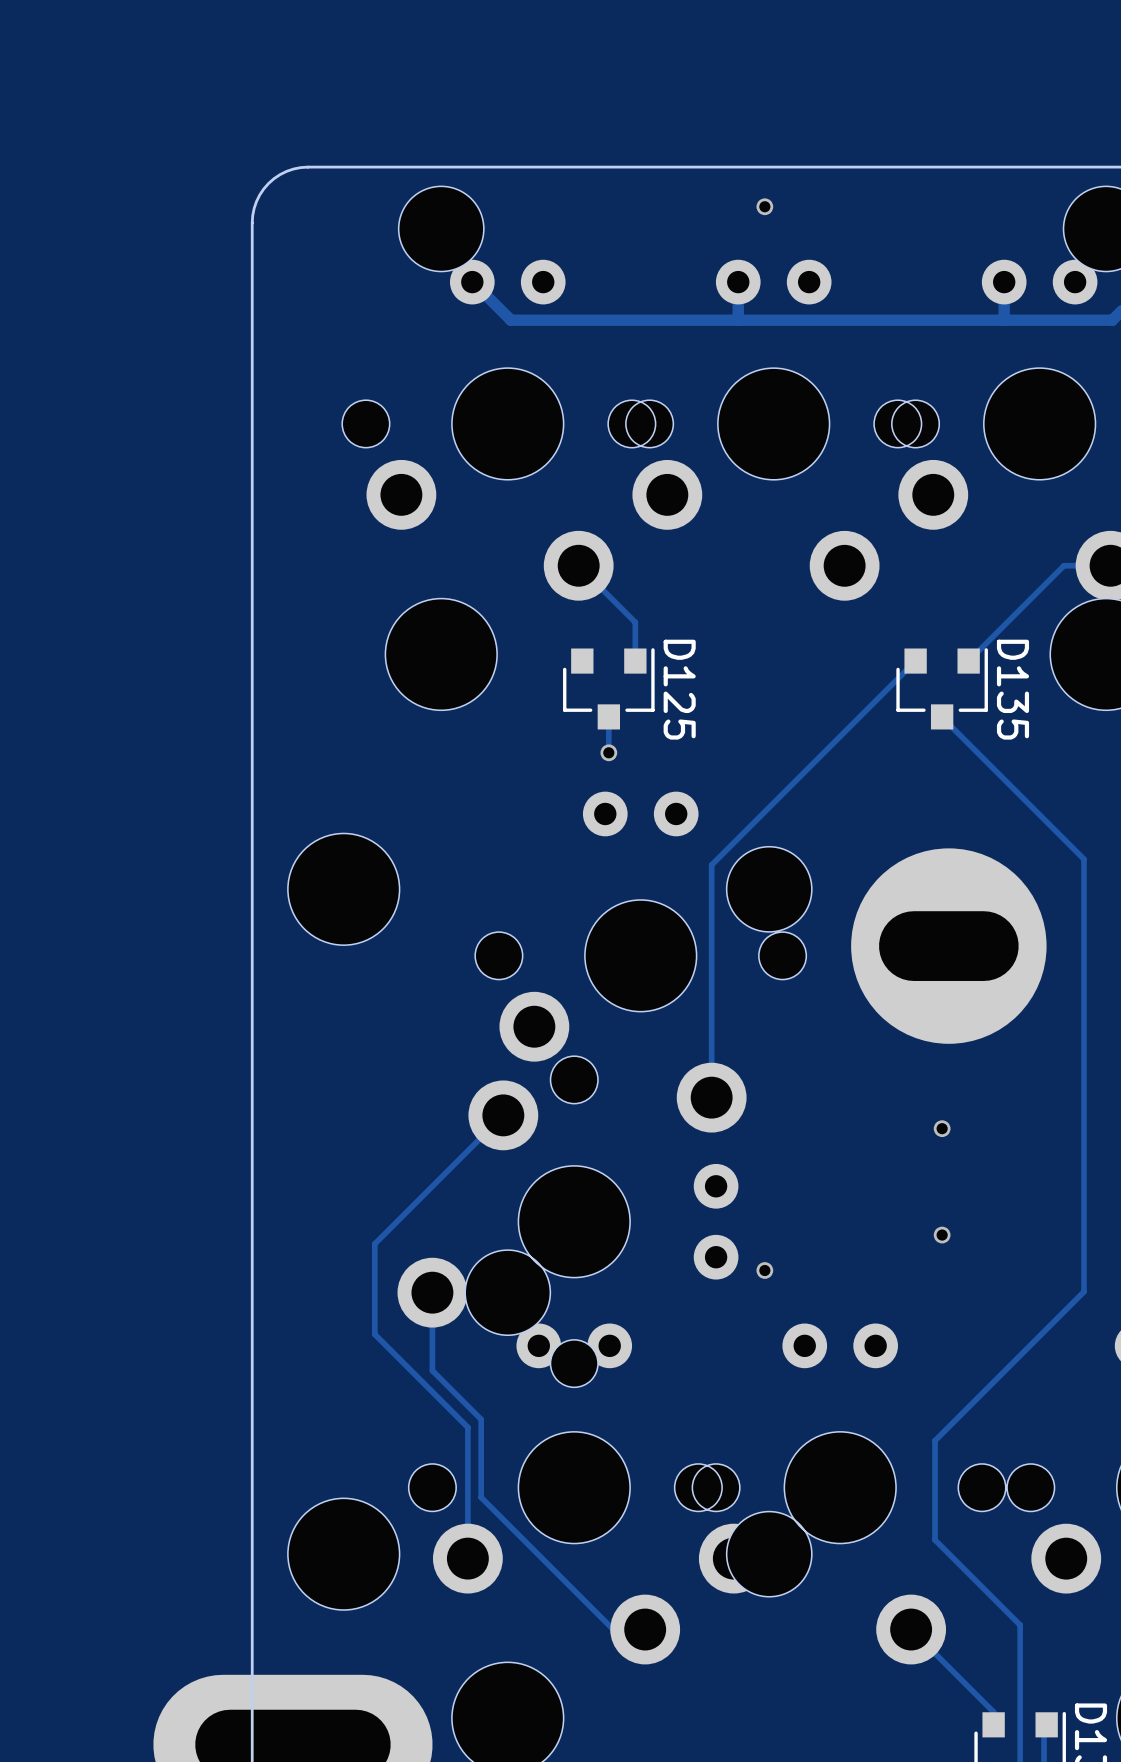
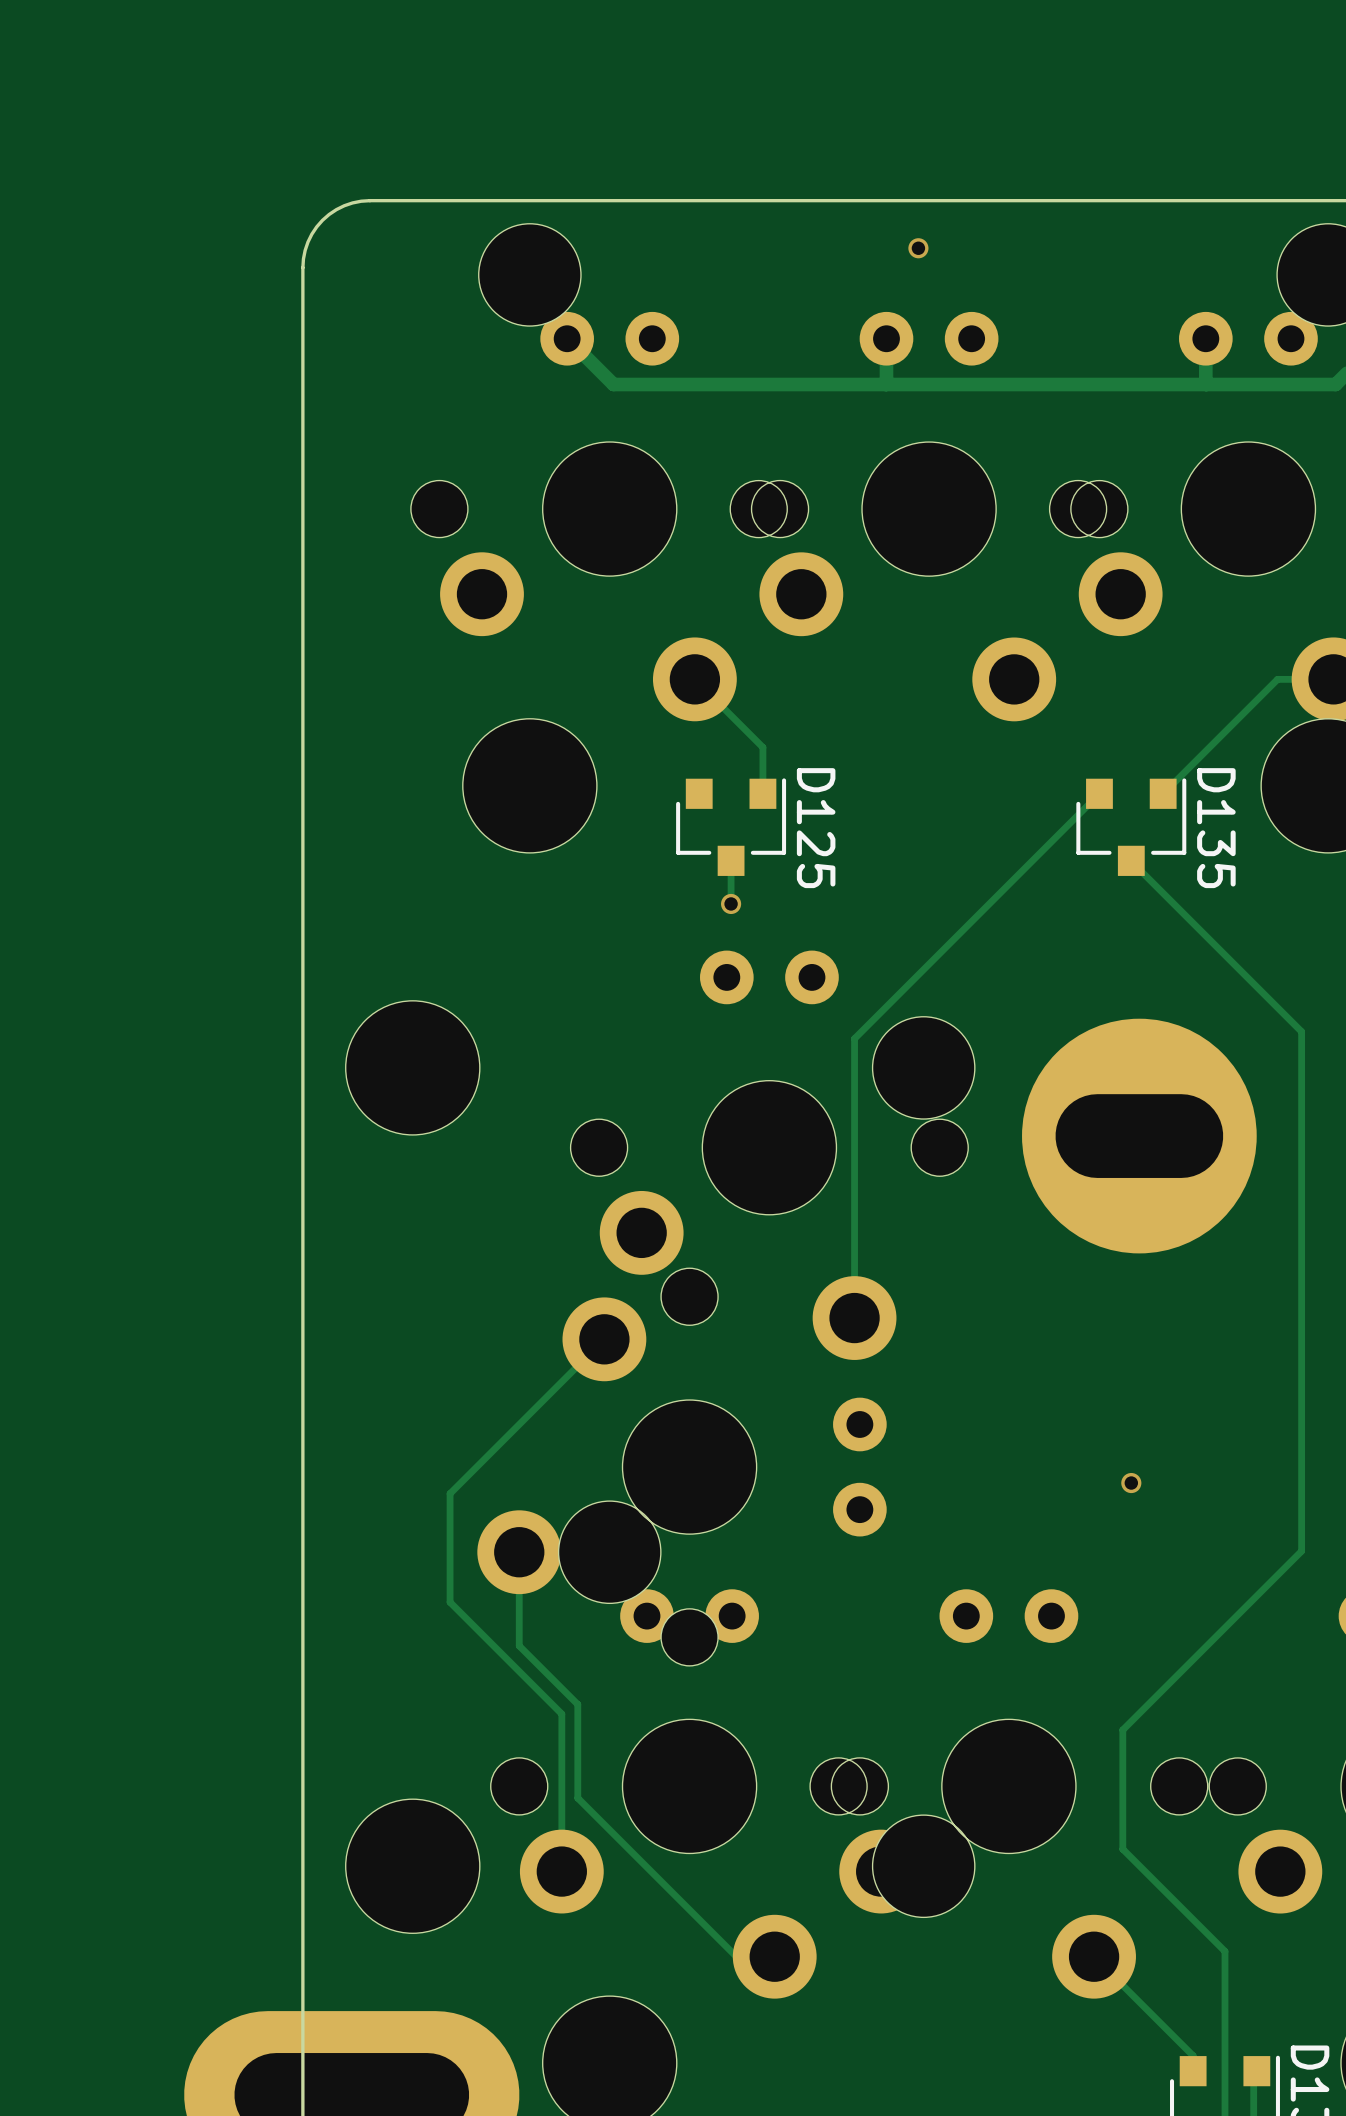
via: (942, 1128) -> none
via: (764, 1270) -> none

